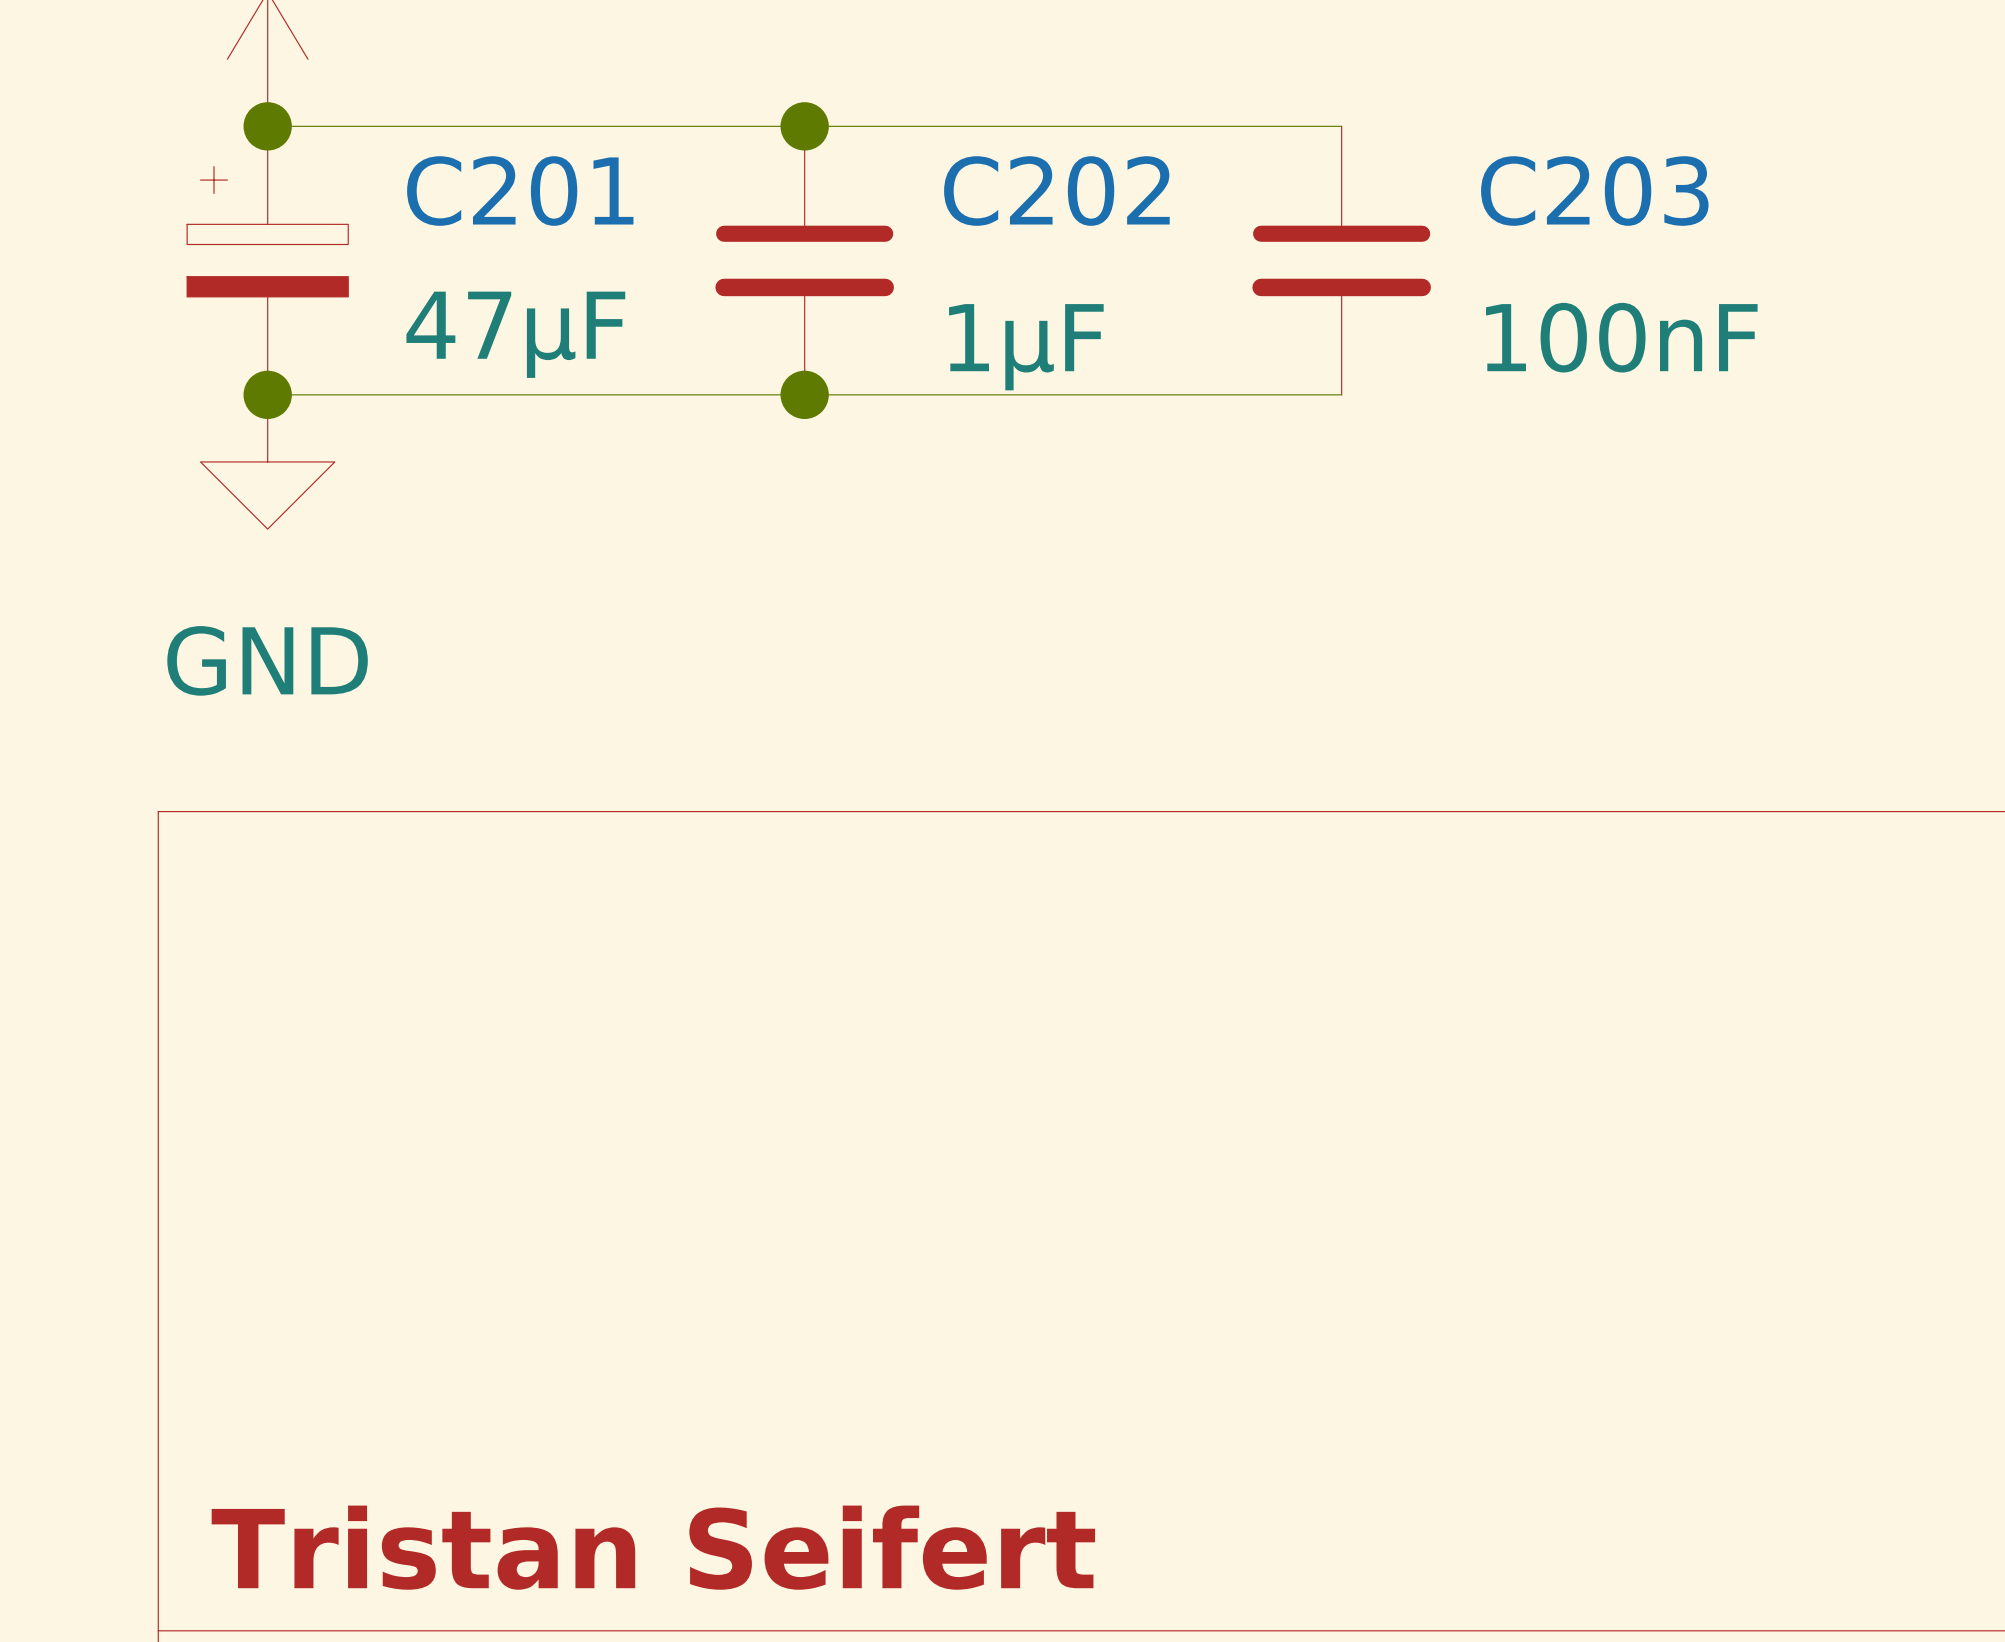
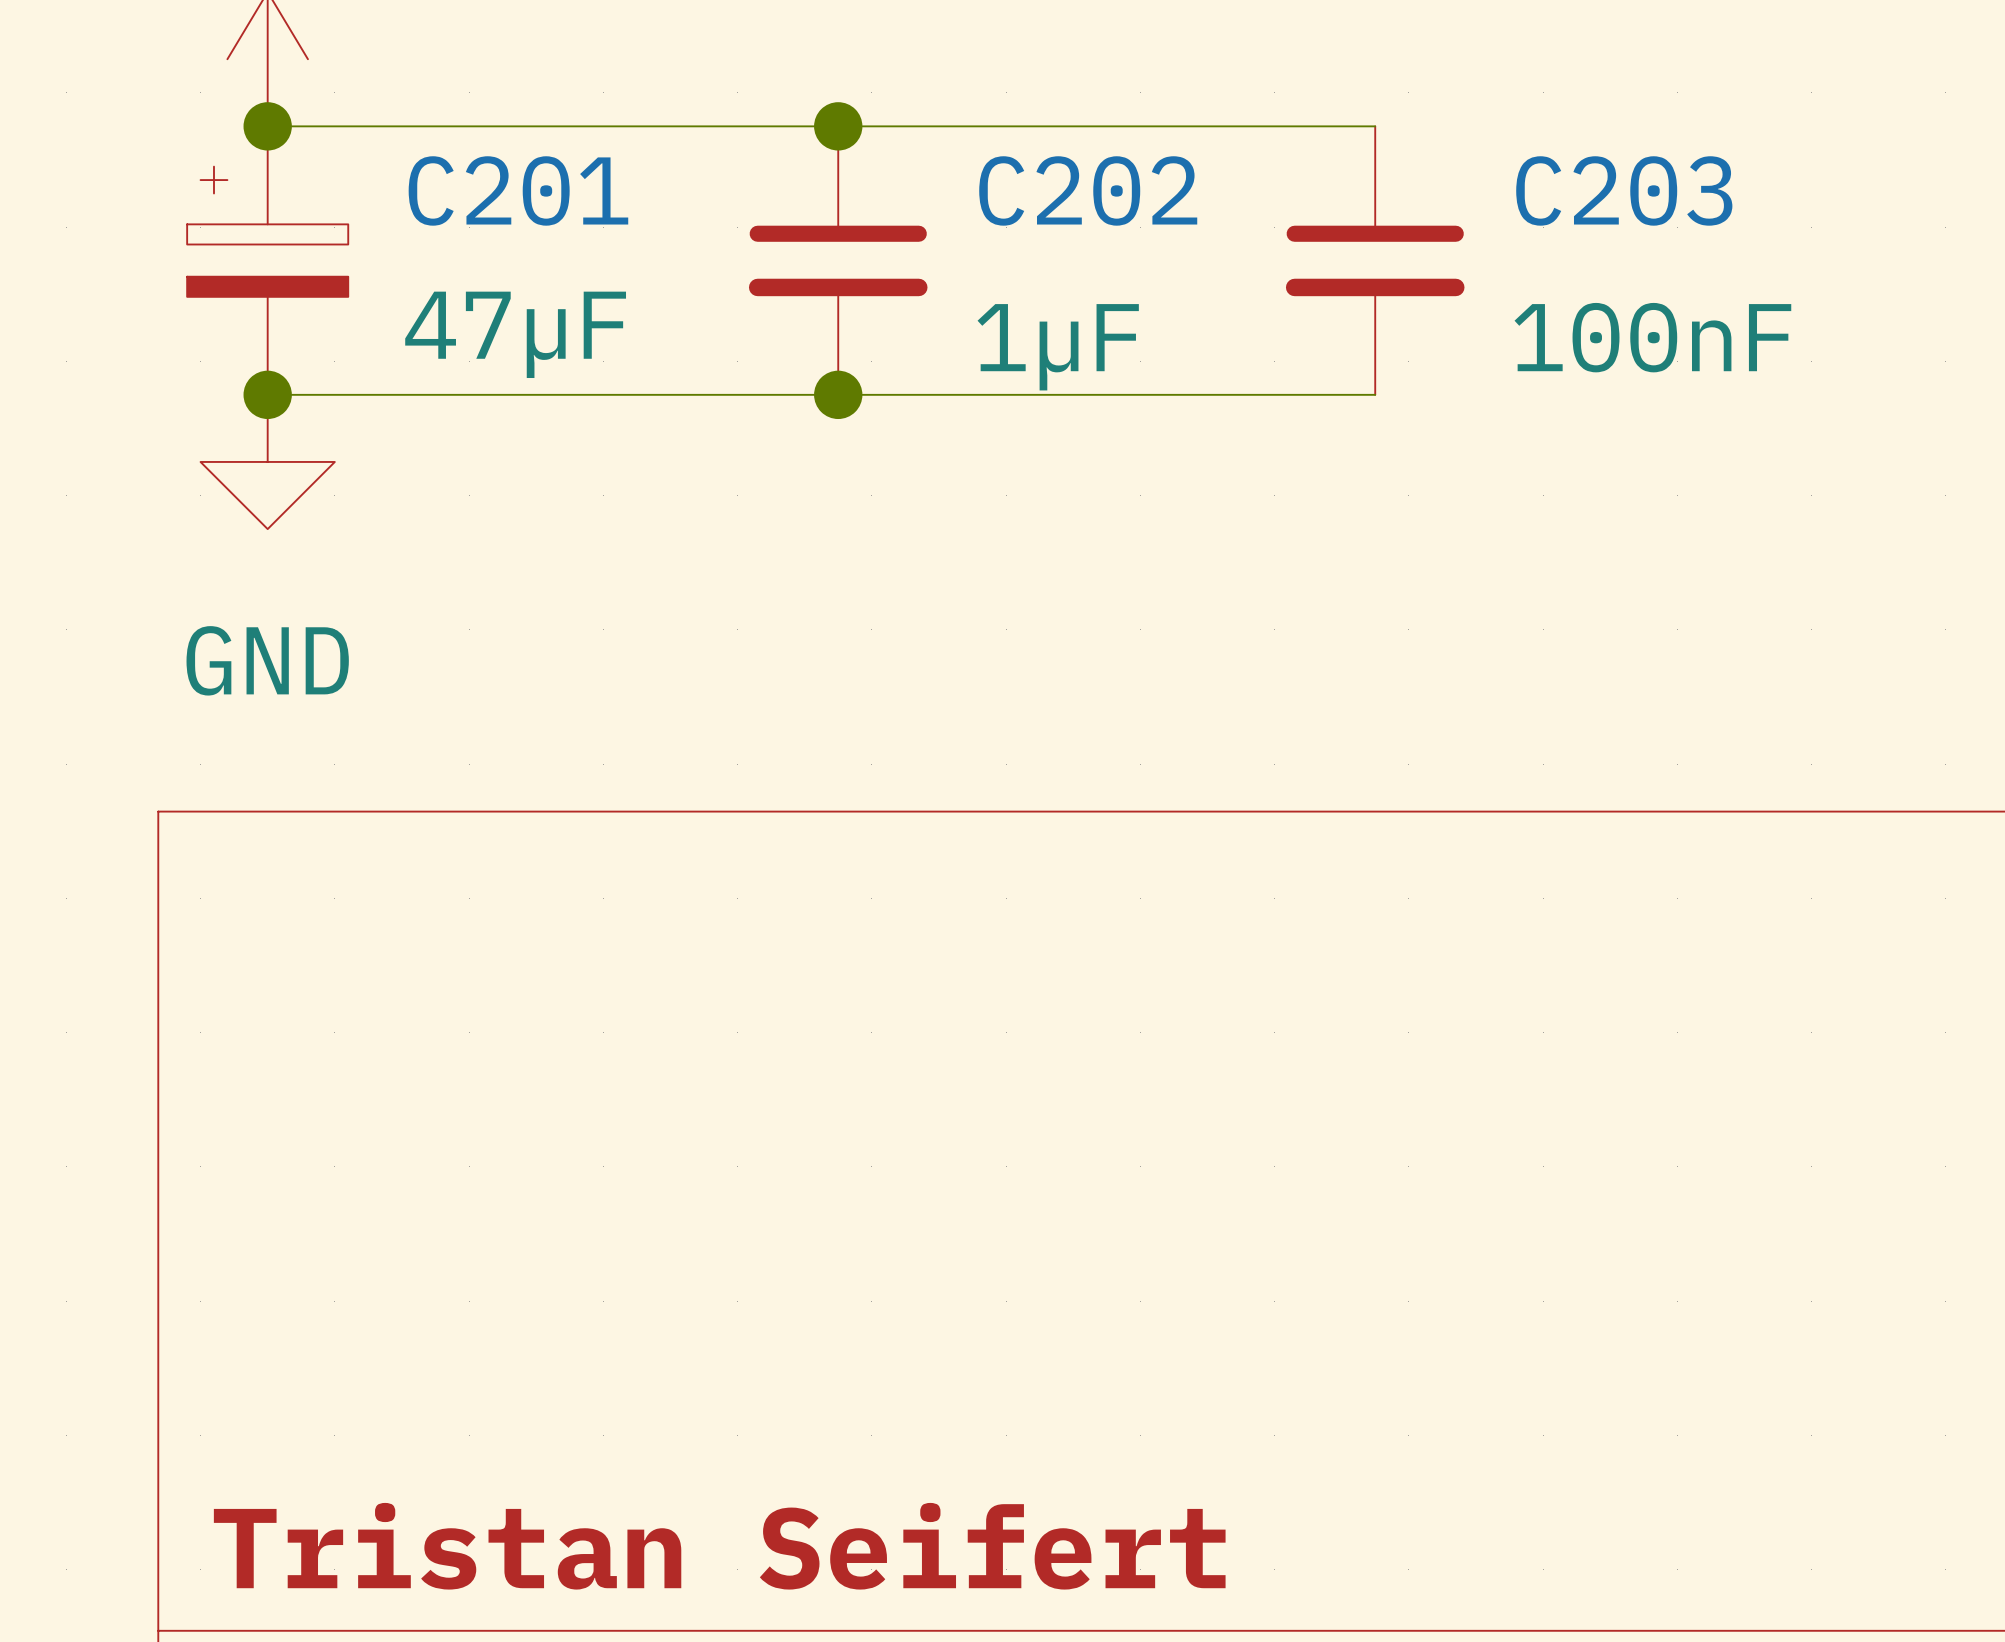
junction position: (804, 126) -> (838, 126)
wire: none -> (1341, 126) (1375, 126)
C202 position: (804, 260) -> (838, 260)
C203 position: (1341, 260) -> (1375, 260)
junction position: (804, 394) -> (838, 394)
wire: none -> (1341, 394) (1375, 394)

